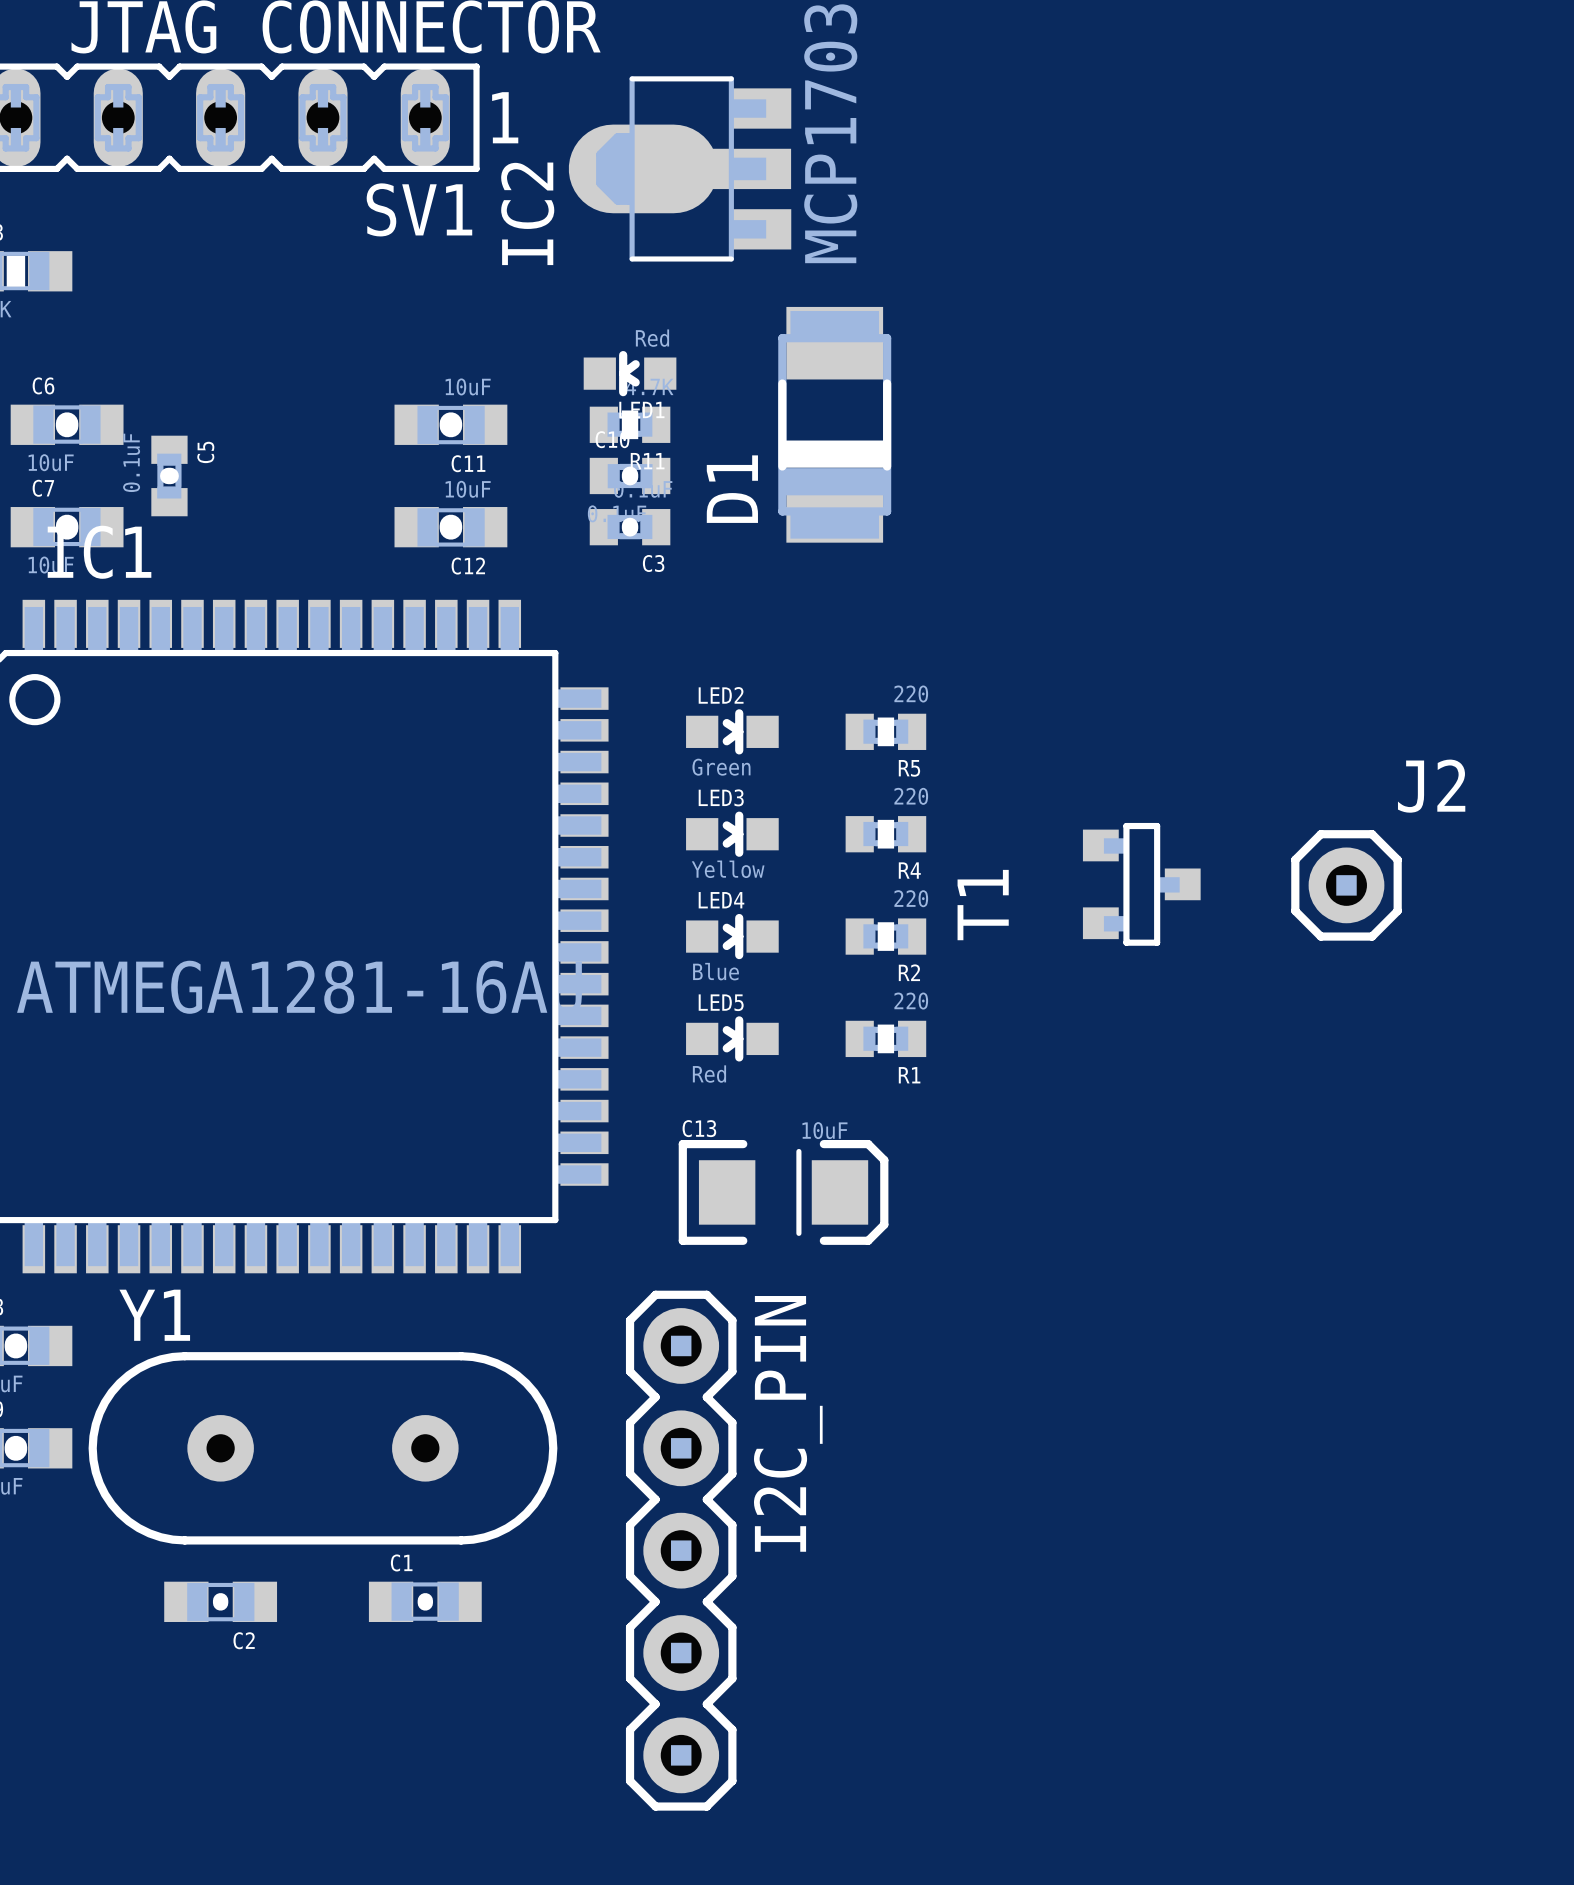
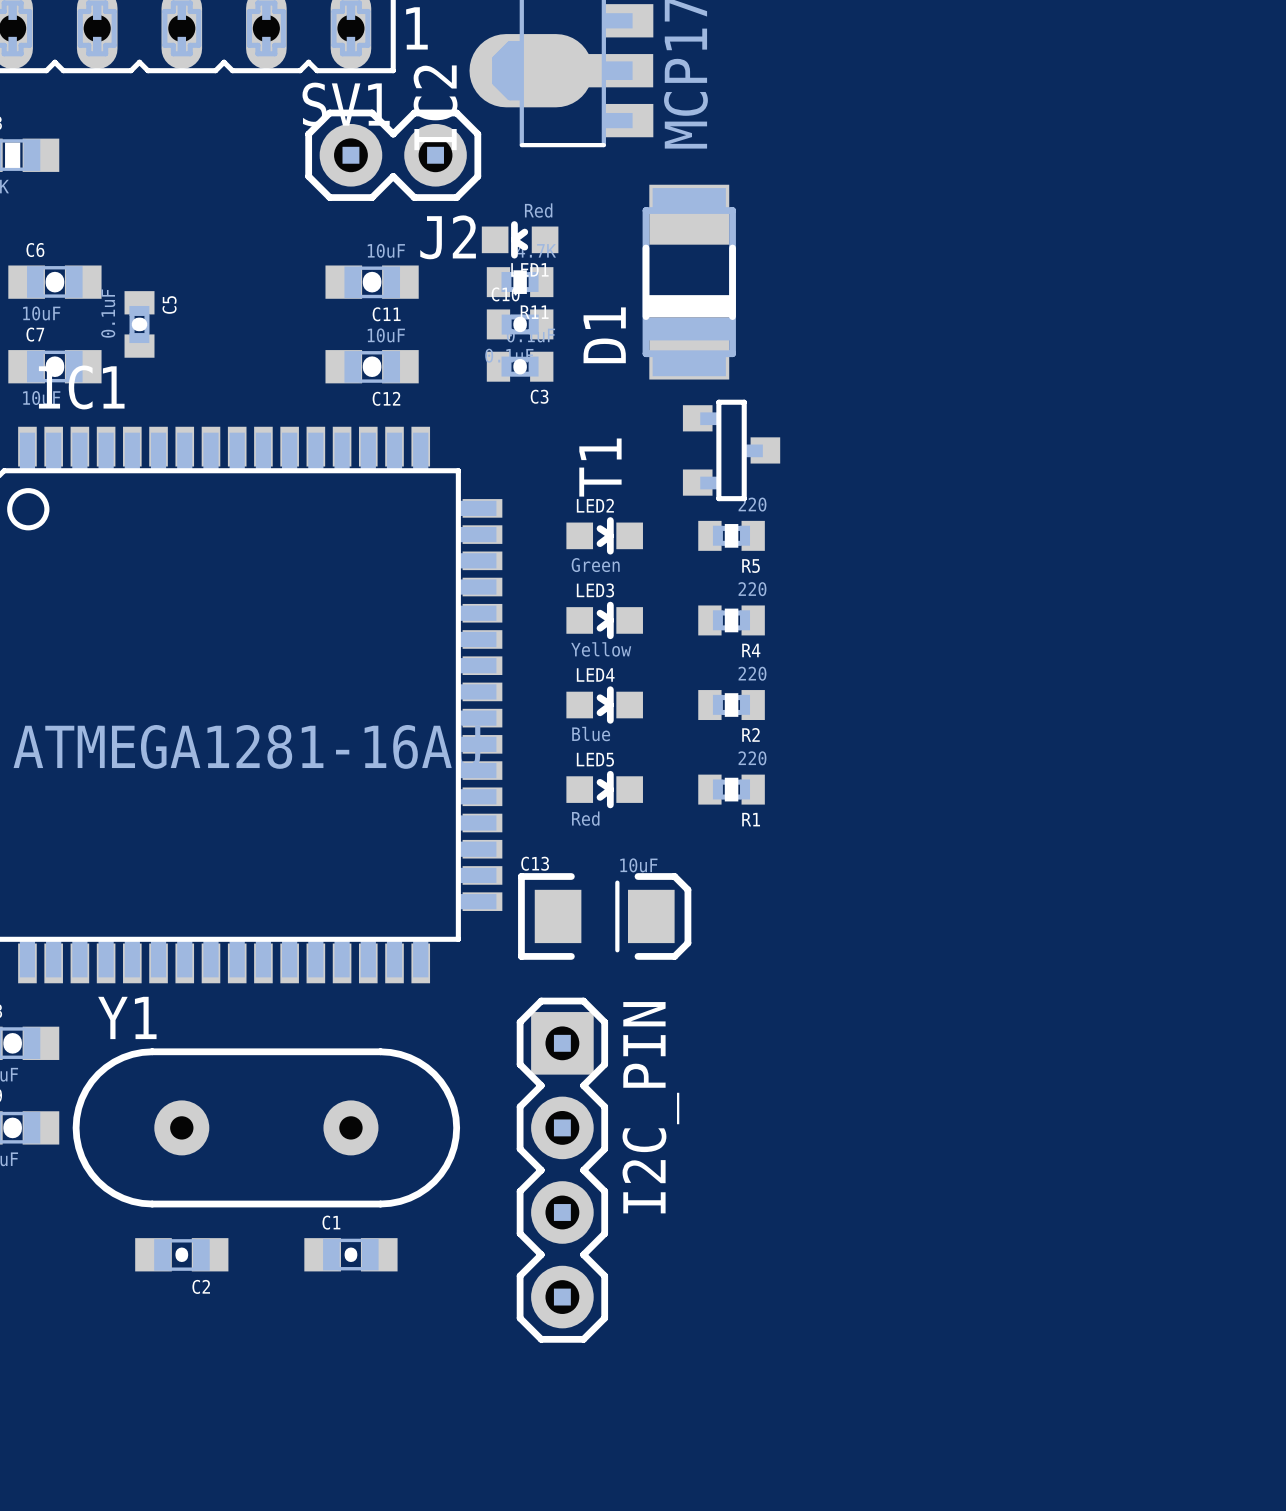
J2 name position: J2 (1431, 786) -> J2 (448, 237)
J2 footprint: [1291, 830, 1402, 941] -> [305, 109, 482, 201]
T1 position: (1141, 884) -> (731, 450)
C13 position: (783, 1192) -> (604, 916)
I2C_PIN footprint: [625, 1290, 737, 1811] -> [516, 997, 609, 1343]

